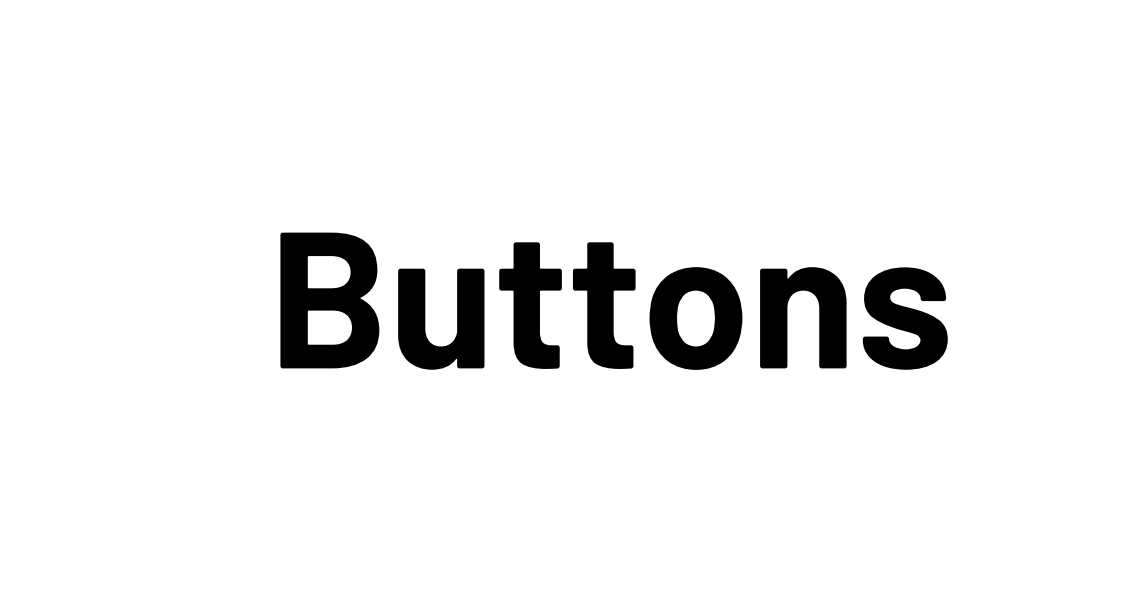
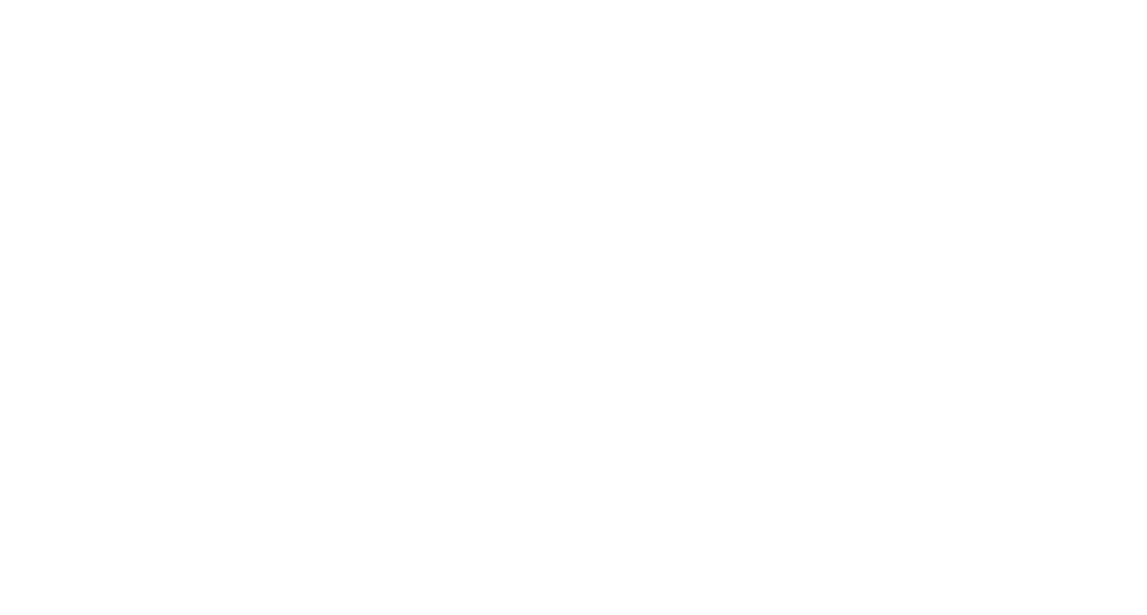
text: Buttons (614, 301) -> none

